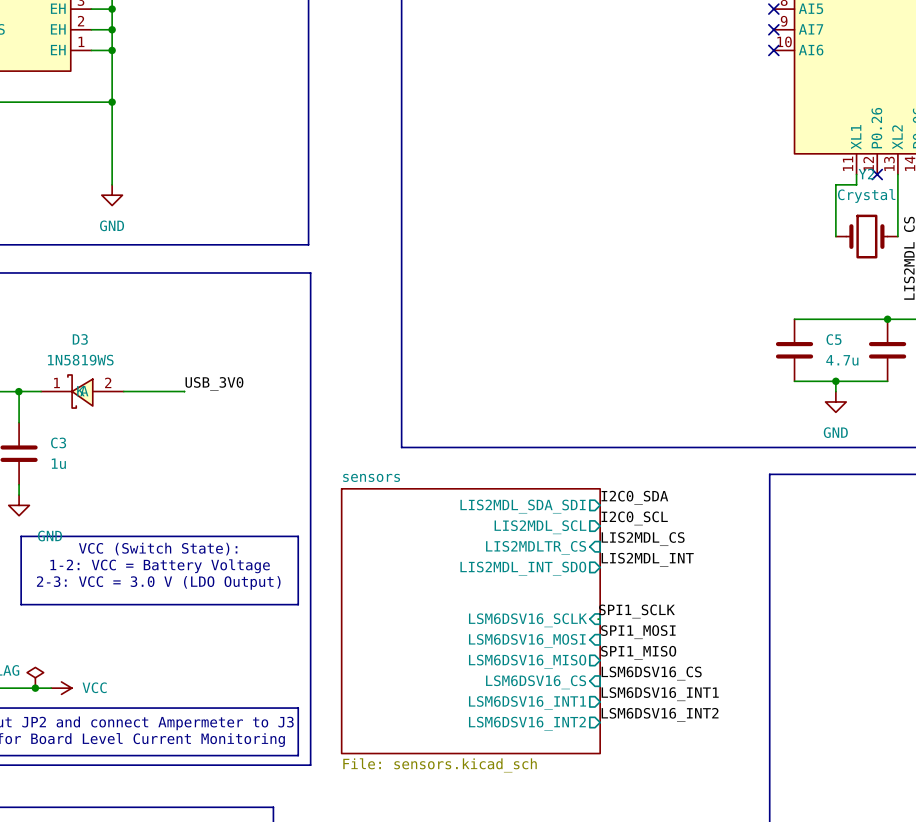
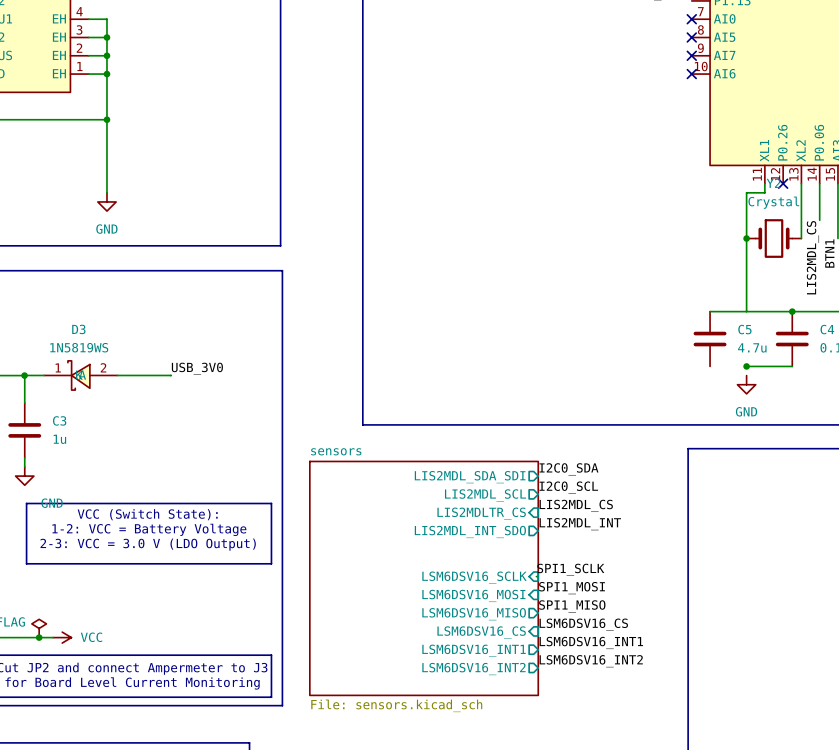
wire: none -> (746, 238) (746, 311)
junction: none -> (746, 238)
wire: (794, 381) (835, 381) (835, 391) -> none

